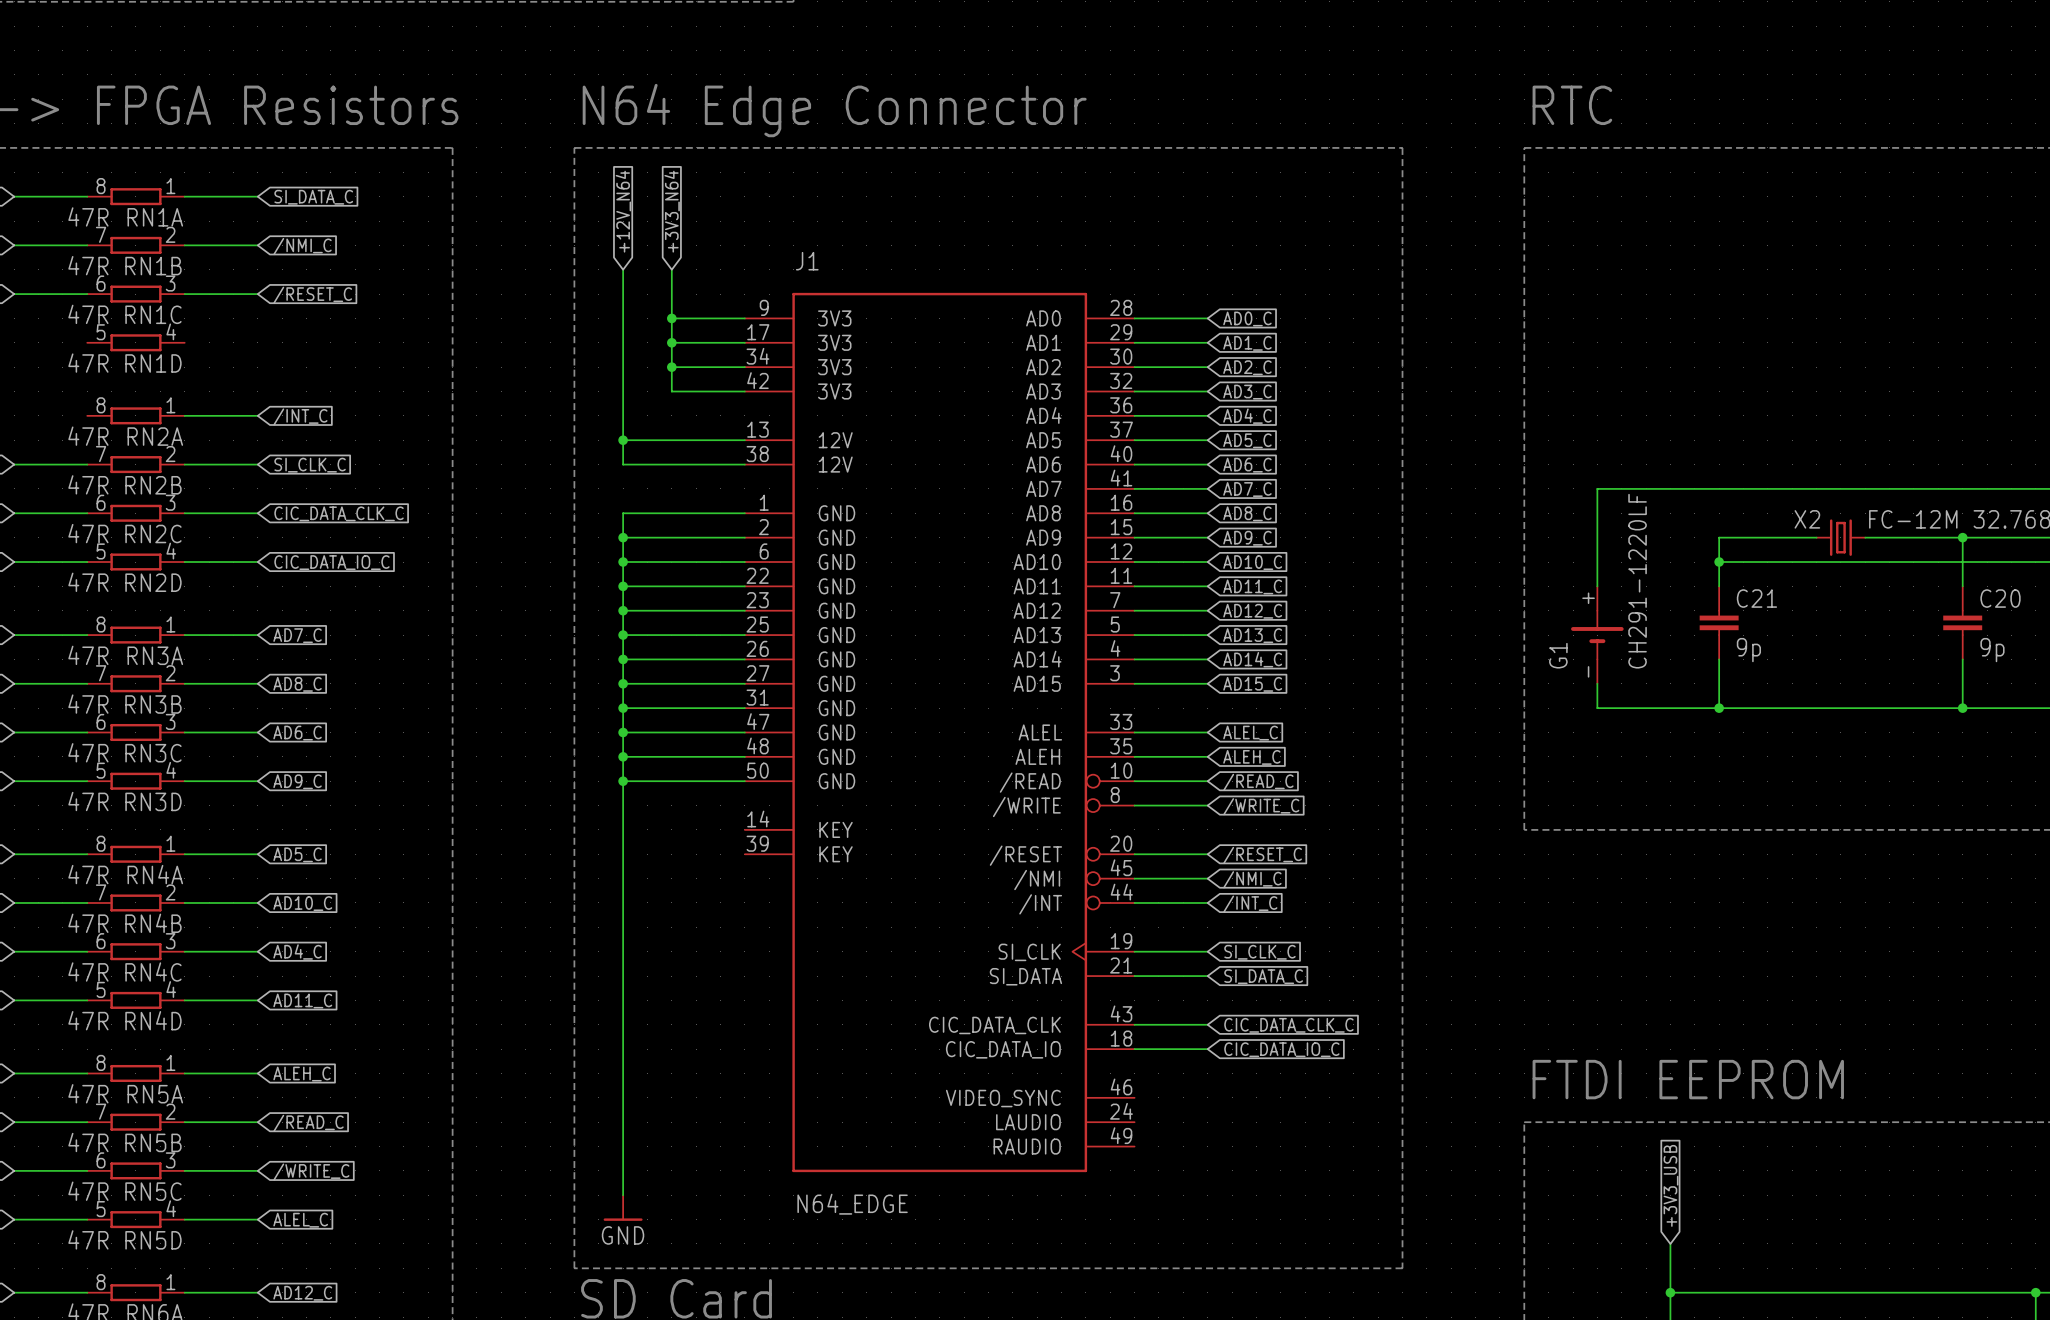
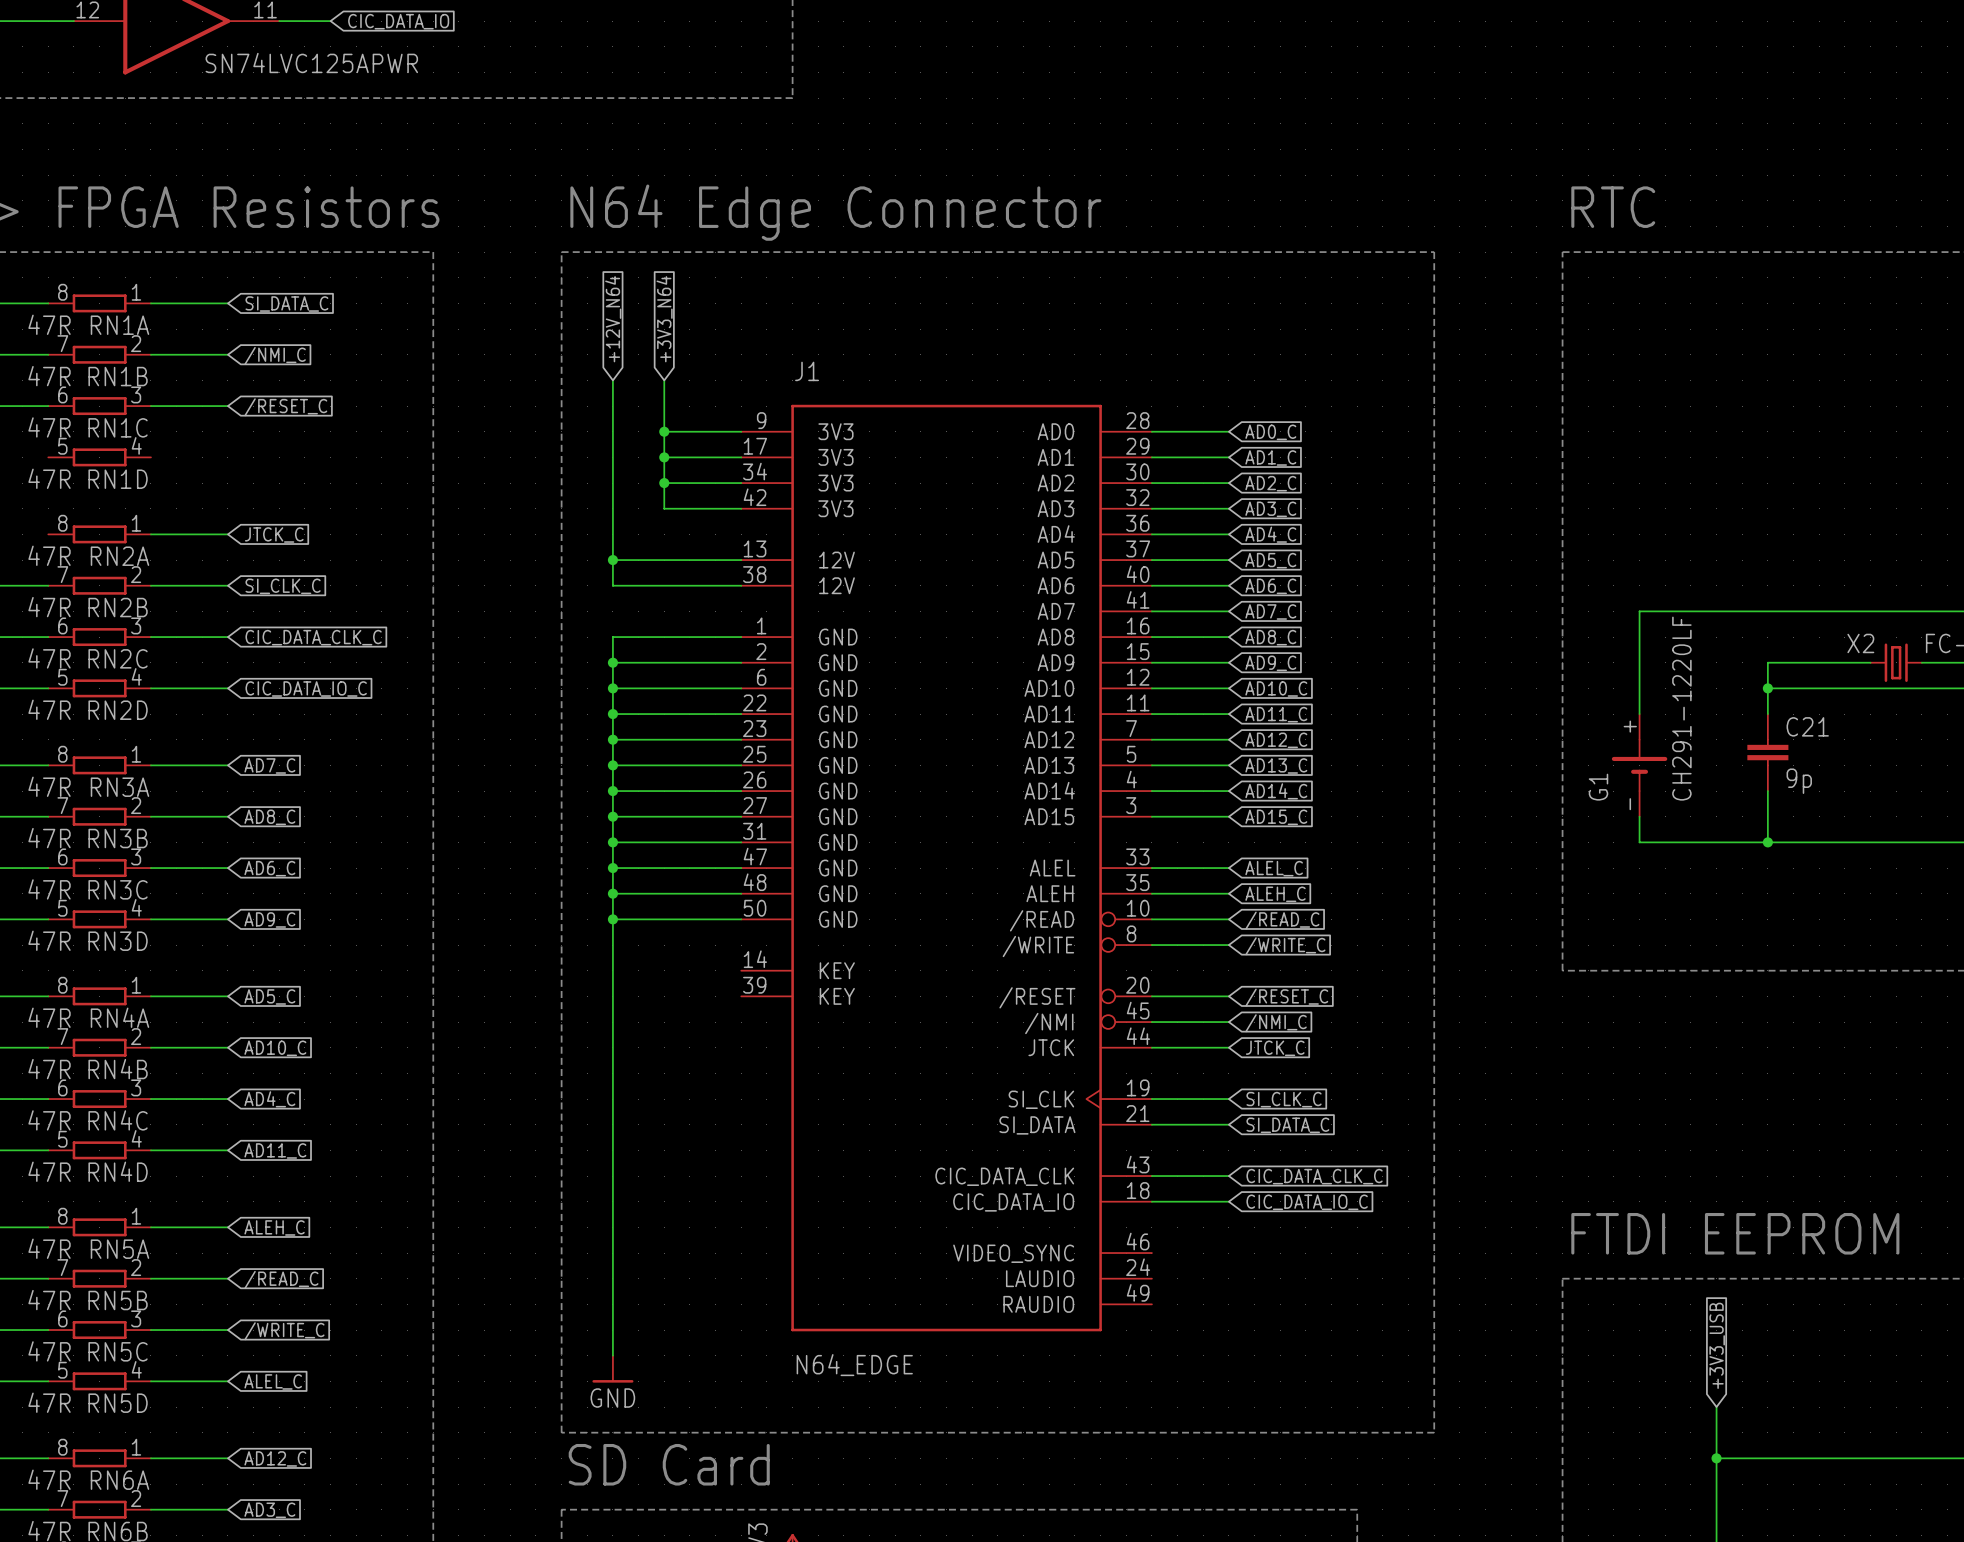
J1 symbol: [744, 292, 1135, 1173] -> [741, 404, 1152, 1332]
global label: /INT_C (300, 417) -> JTCK_C (274, 535)
global label: /INT_C (1250, 904) -> JTCK_C (1275, 1048)

